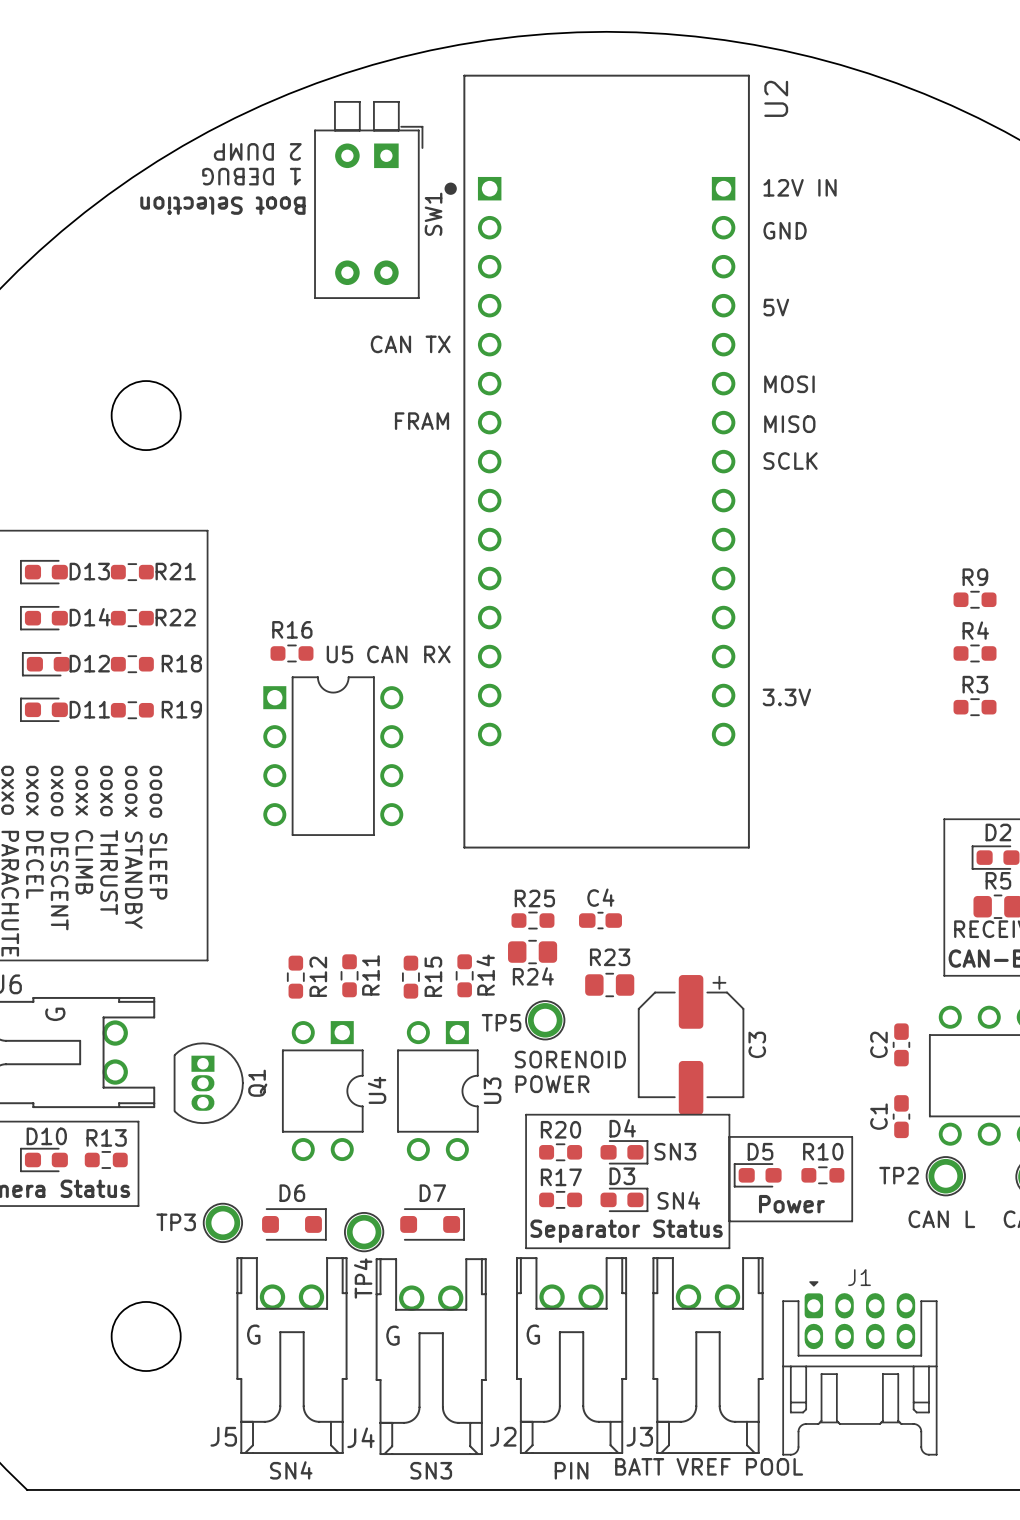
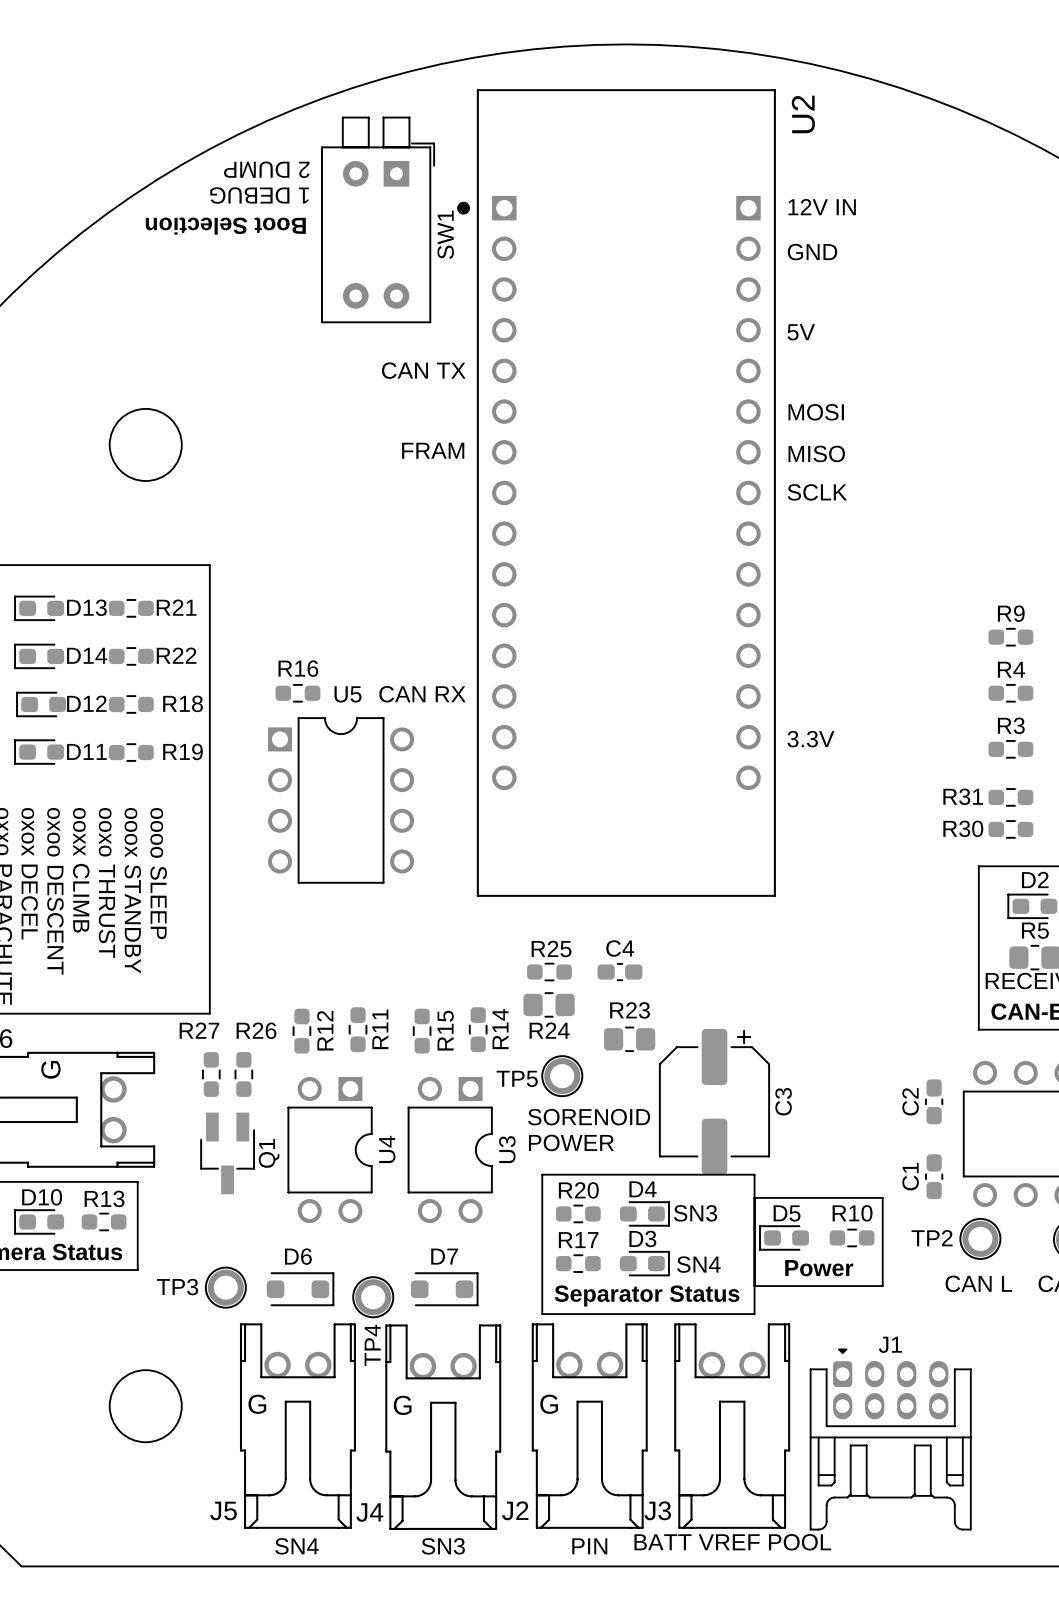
R31: none -> (1010, 797)
R30: none -> (1010, 829)
R27: none -> (211, 1074)
R26: none -> (243, 1074)
Q1 footprint: [173, 1042, 244, 1125] -> [200, 1112, 255, 1195]

